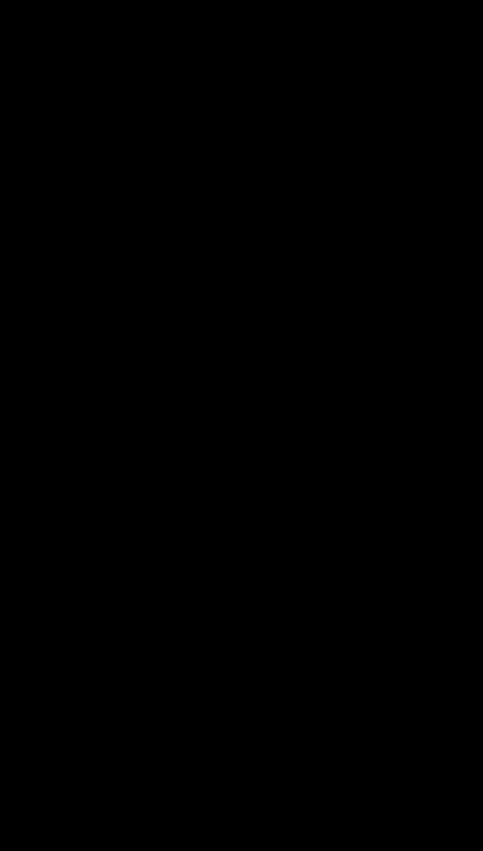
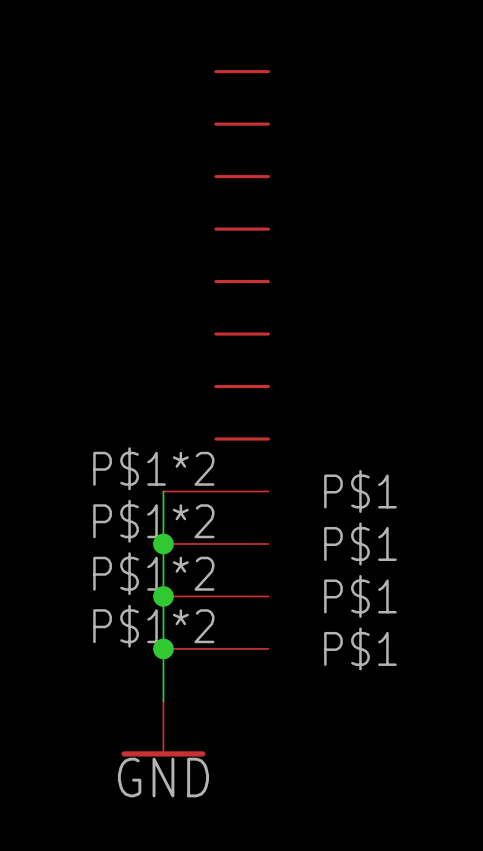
part: none -> (242, 71)
part: none -> (242, 124)
part: none -> (242, 176)
part: none -> (242, 229)
part: none -> (242, 281)
part: none -> (242, 334)
part: none -> (242, 386)
part: none -> (242, 439)
wire: none -> (163, 491) (163, 701)
part: none -> (215, 491)
junction: none -> (163, 543)
part: none -> (215, 543)
junction: none -> (163, 596)
part: none -> (215, 596)
junction: none -> (163, 648)
part: none -> (215, 648)
power symbol: none -> GND (163, 728)

